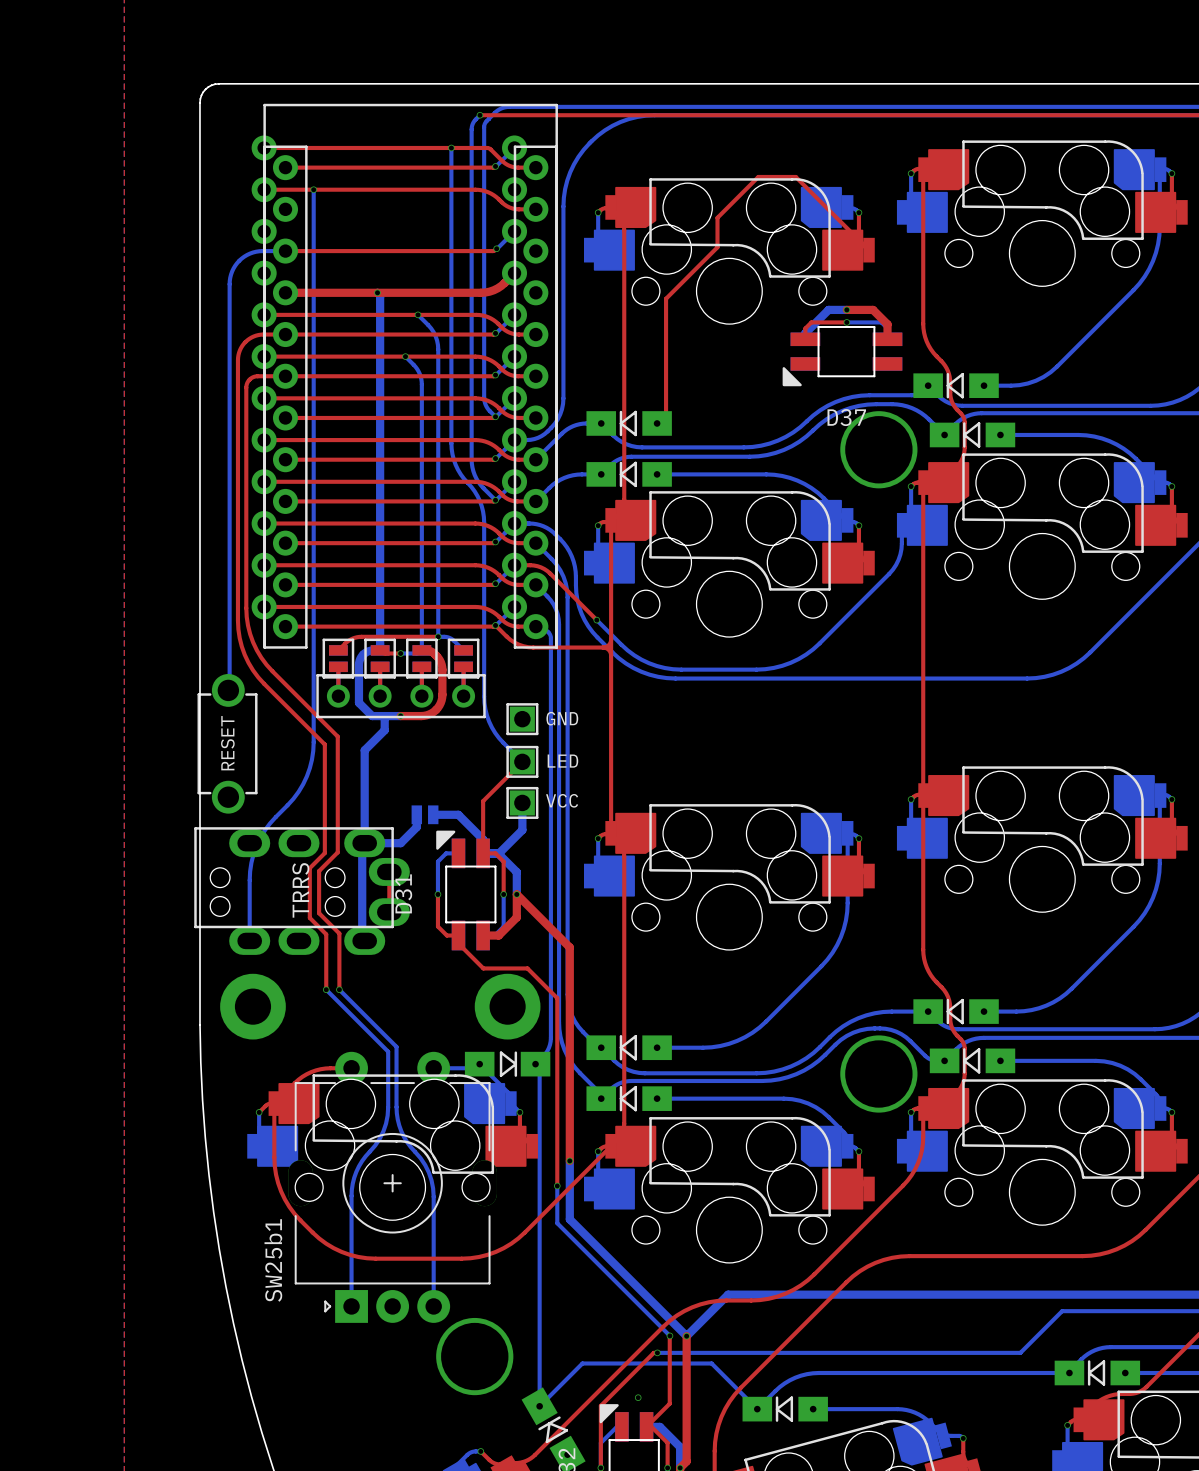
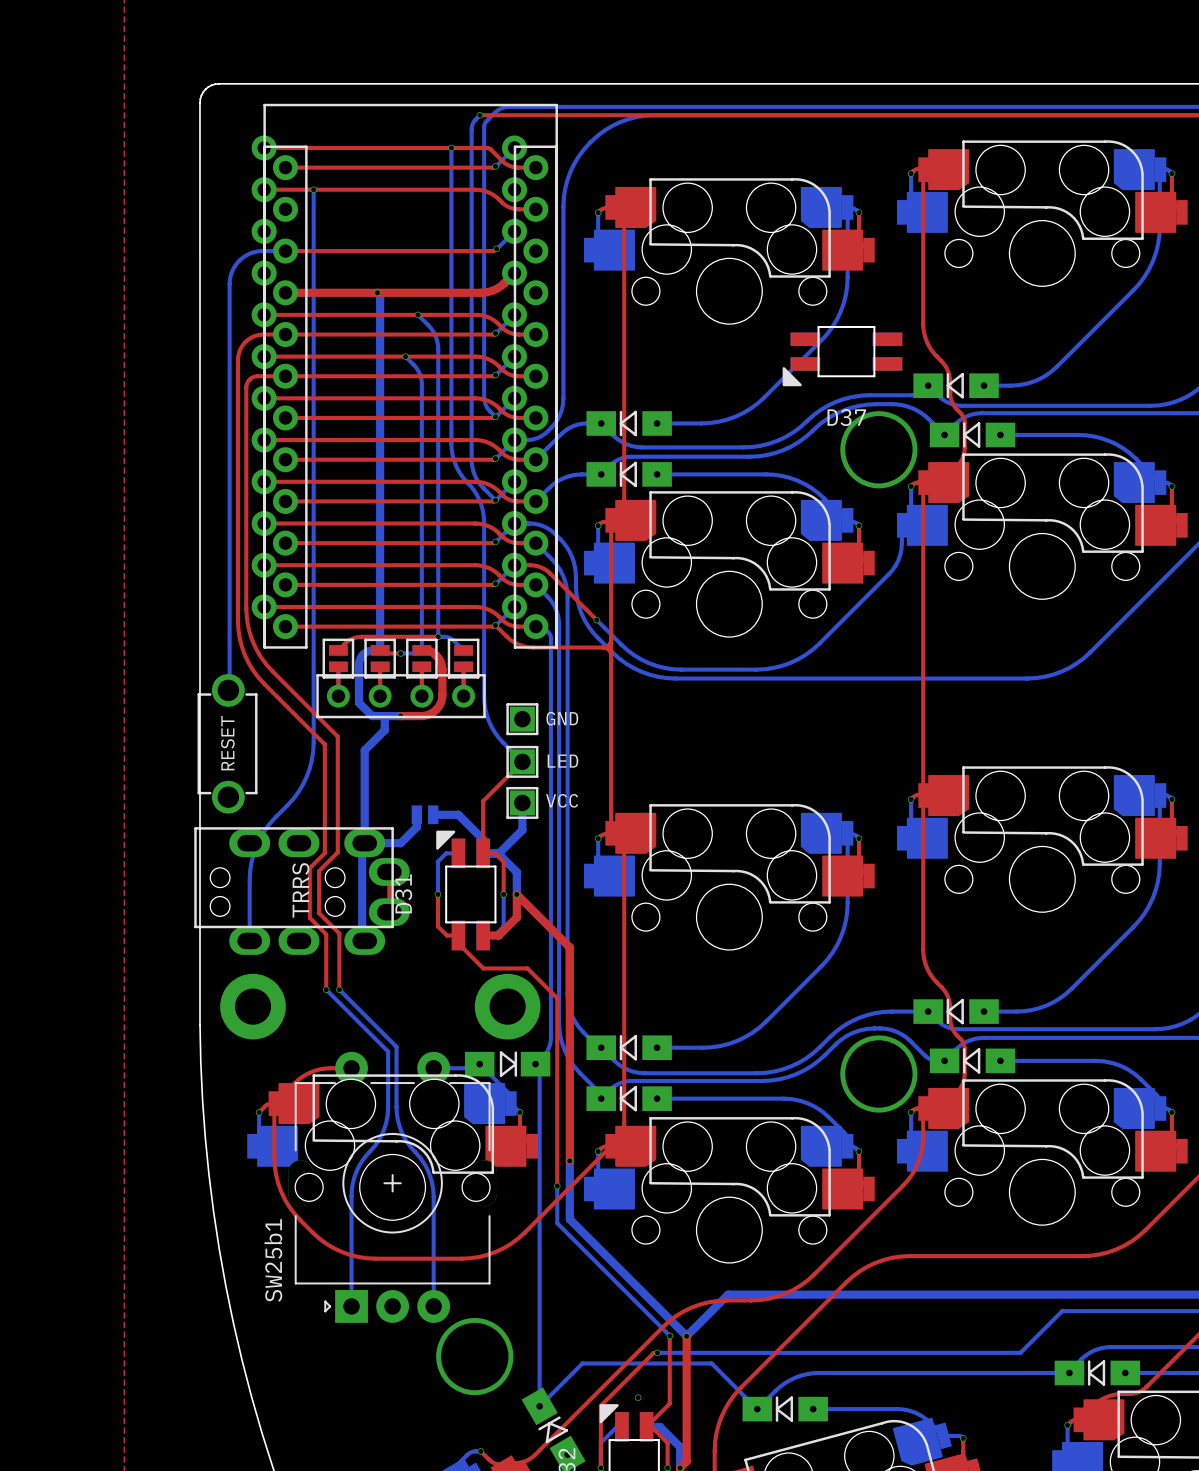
bottom track: none -> (851, 208) (847, 211) (845, 294) (840, 311) (827, 333) (764, 397) (743, 412) (727, 419) (710, 423) (657, 423)
top track: (869, 250) (795, 176) (758, 176) (717, 217) (717, 247) (666, 298) (666, 414) (657, 423) -> none
top track: (846, 309) (873, 309) (887, 324) (887, 339) -> none
bottom track: (846, 309) (828, 309) (805, 333) (805, 339) -> none
via: (846, 309) -> none
top track: (846, 322) (811, 322) (805, 328) (805, 339) -> none
bottom track: (846, 322) (881, 322) (887, 328) (887, 339) -> none
via: (846, 322) -> none

